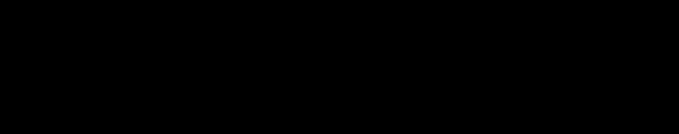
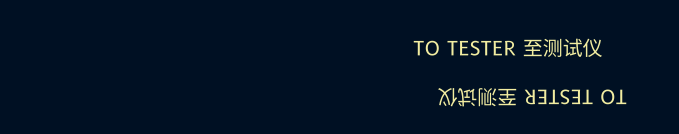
text: none -> TO TESTER 至测试仪 (507, 47)
text: none -> TO TESTER 至测试仪 (532, 97)

